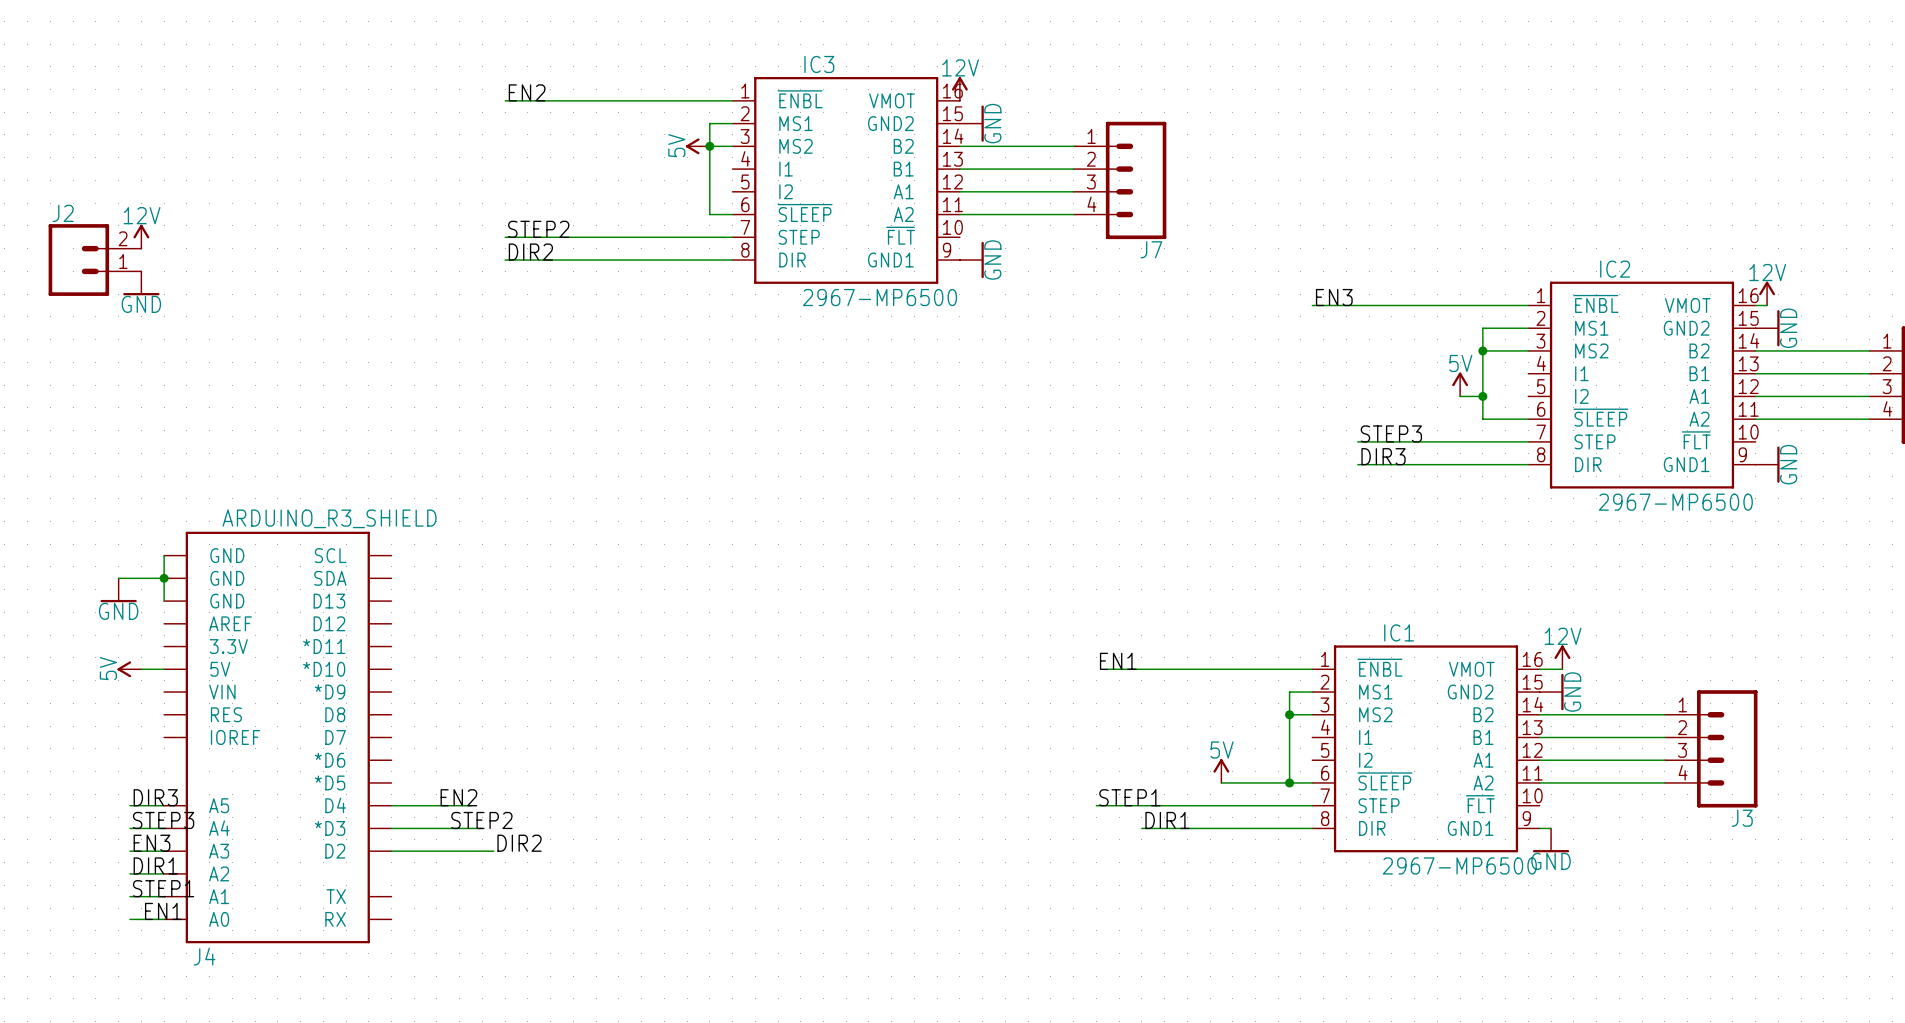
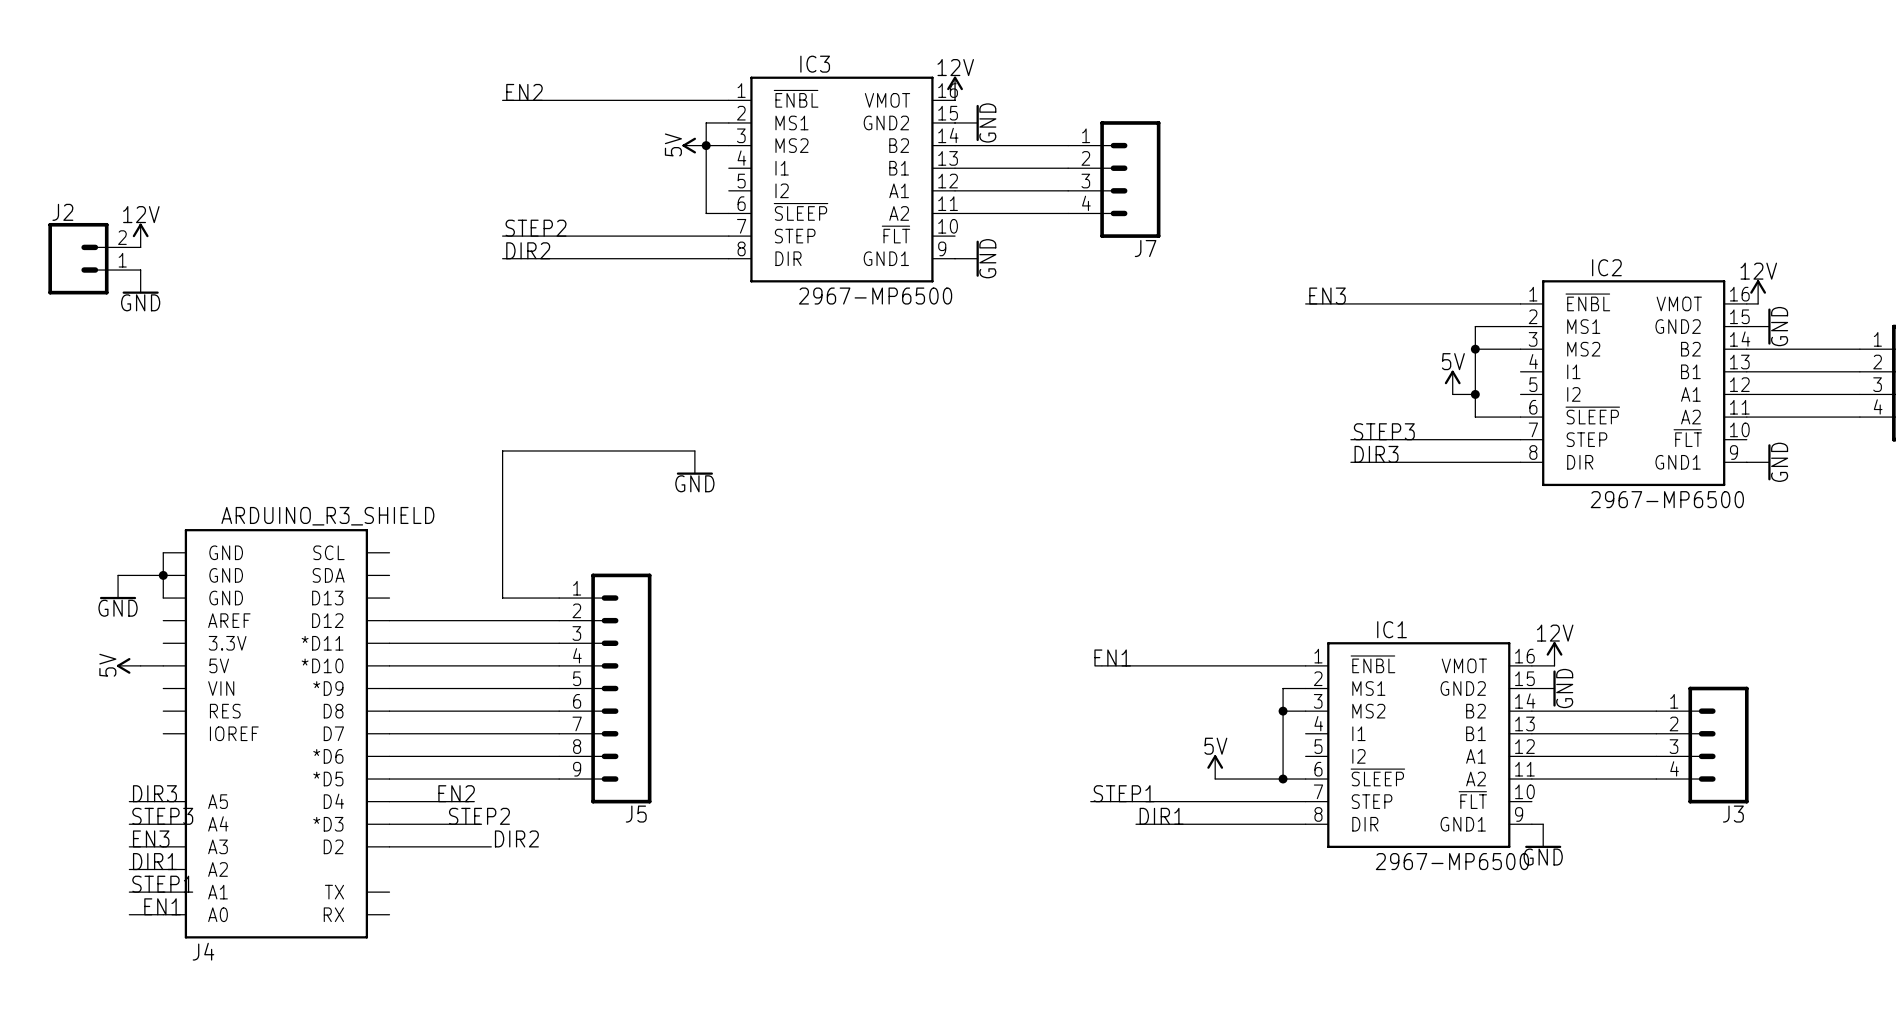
wire: none -> (694, 450) (502, 450) (502, 598) (559, 598)
power symbol: none -> GND (694, 462)
wire: none -> (389, 620) (559, 620)
wire: none -> (389, 643) (559, 643)
wire: none -> (389, 665) (559, 665)
wire: none -> (389, 688) (559, 688)
J5: none -> (605, 688)
wire: none -> (389, 711) (559, 711)
wire: none -> (389, 733) (559, 733)
wire: none -> (389, 756) (559, 756)
wire: none -> (389, 779) (559, 779)

